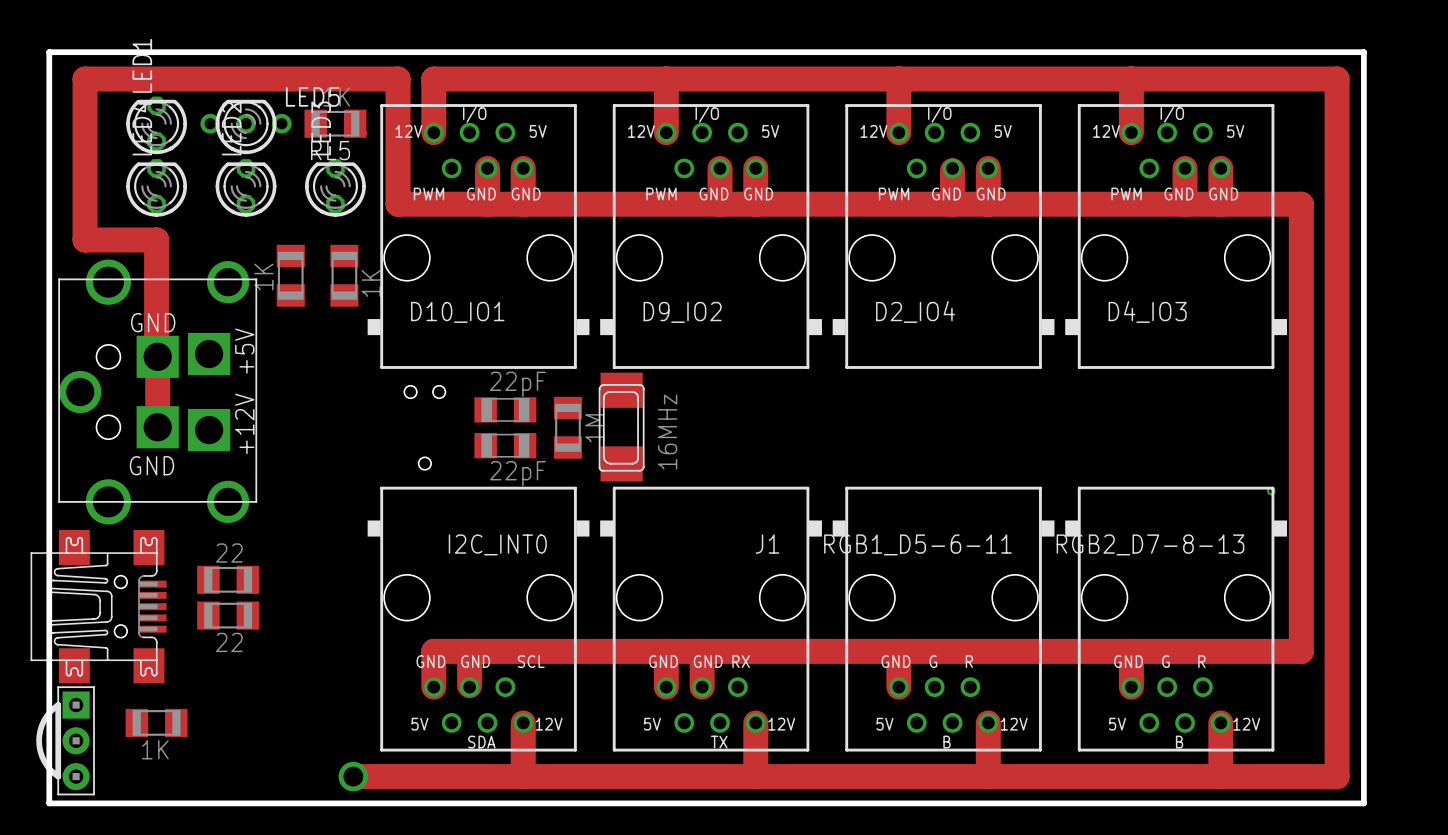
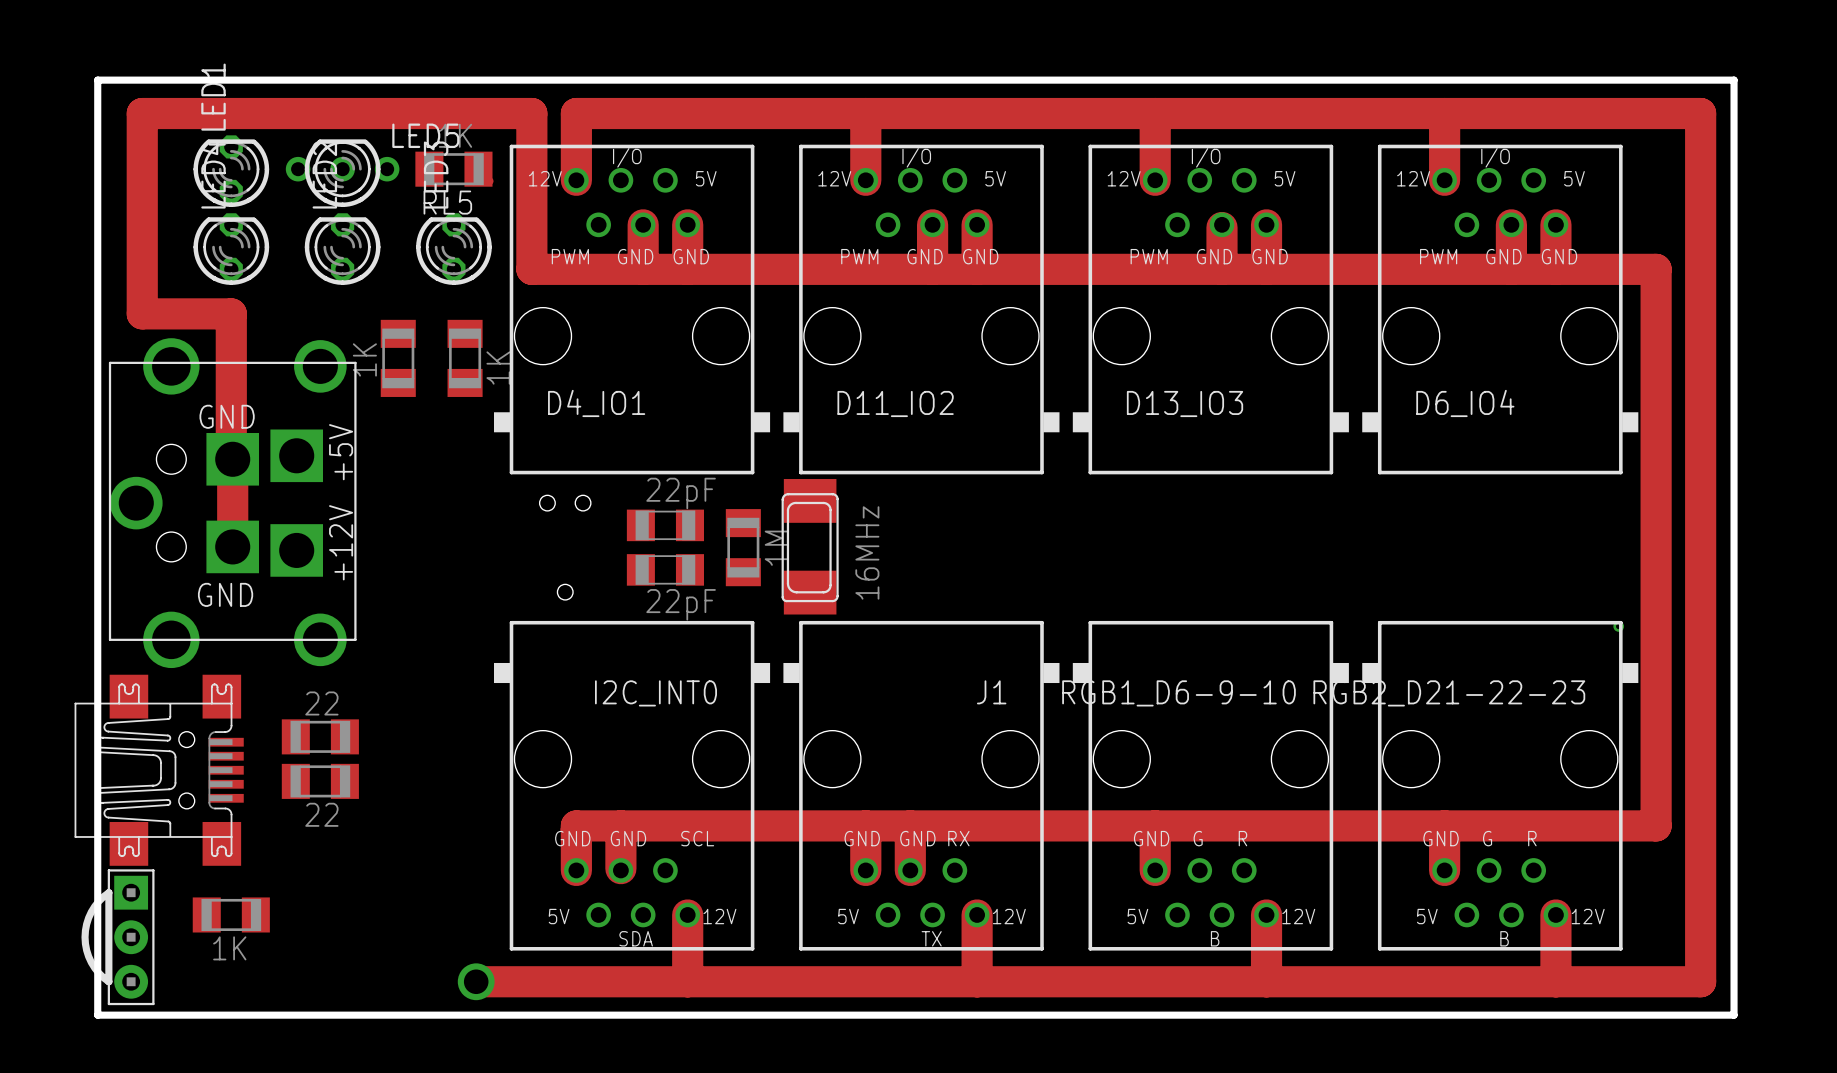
D2_IO4 name: D2_IO4 (915, 311) -> D13_IO3 (1185, 403)
D4_IO3 name: D4_IO3 (1147, 311) -> D6_IO4 (1465, 403)
D10_IO1 name: D10_IO1 (457, 312) -> D4_IO1 (596, 403)
D9_IO2 name: D9_IO2 (682, 312) -> D11_IO2 (895, 403)
RGB1_D5-6-11 name: RGB1_D5-6-11 (917, 544) -> RGB1_D6-9-10 (1179, 693)
RGB2_D7-8-13 name: RGB2_D7-8-13 (1150, 544) -> RGB2_D21-22-23 (1449, 693)

